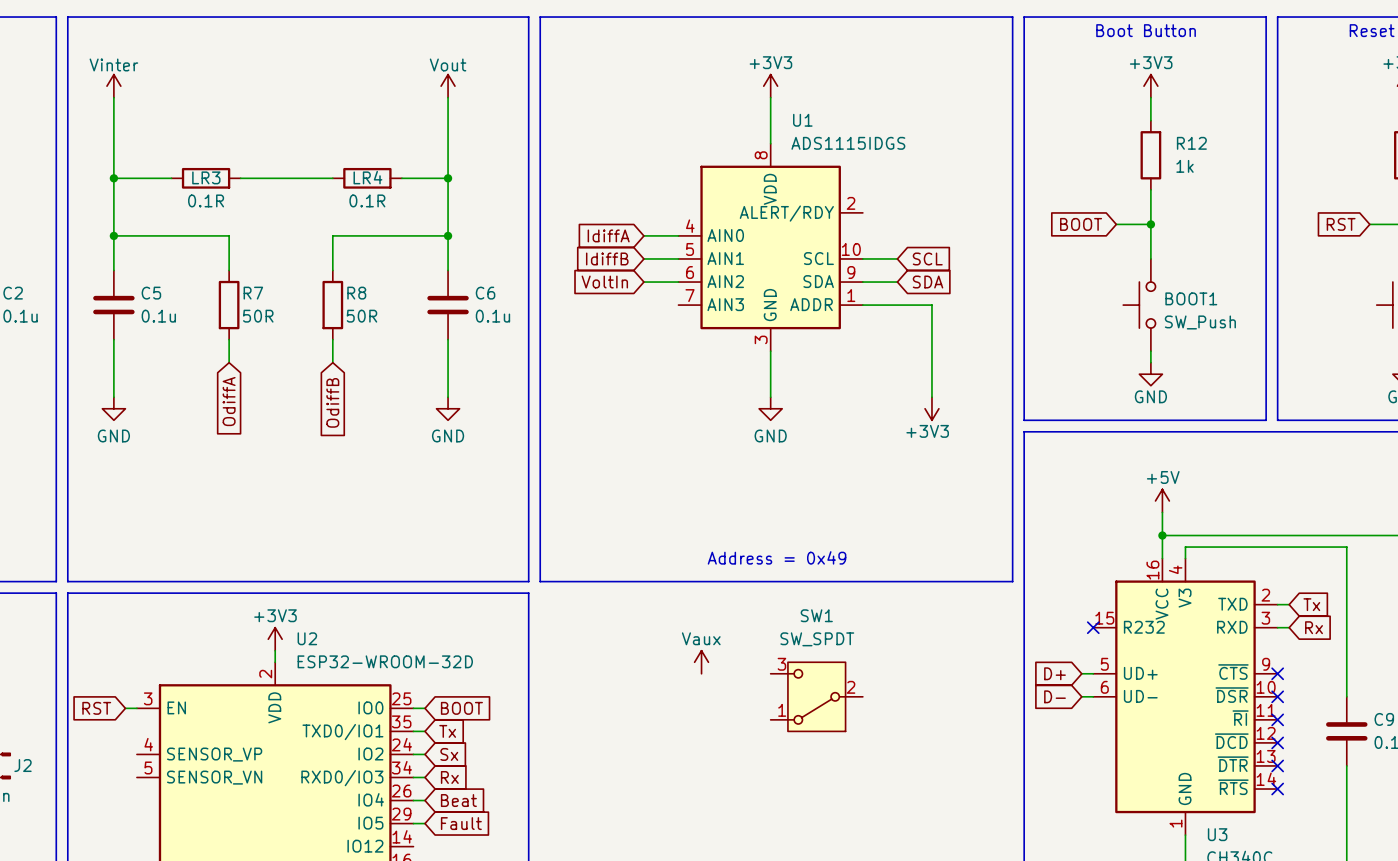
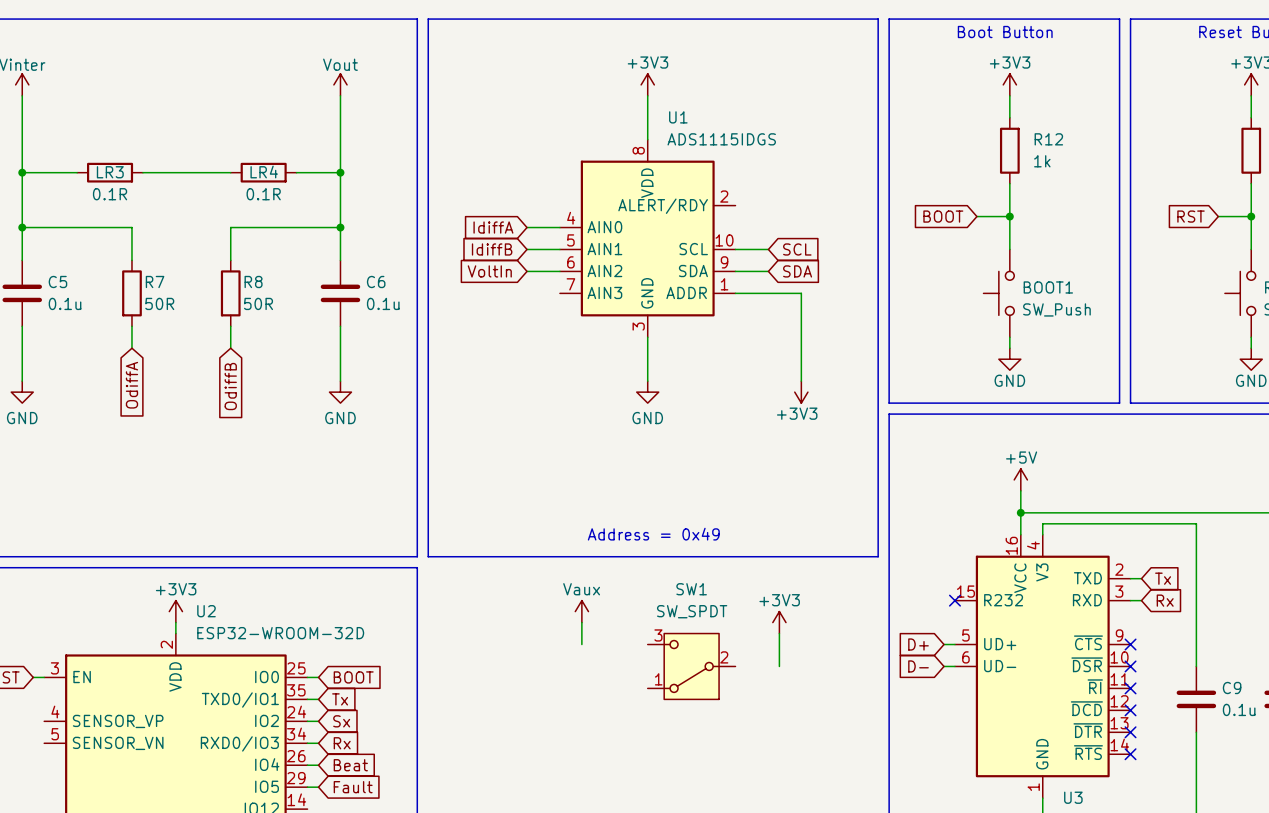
power symbol: none -> +3V3 (779, 622)
power symbol position: Vaux (701, 662) -> Vaux (581, 611)
wire: none -> (779, 633) (779, 666)

